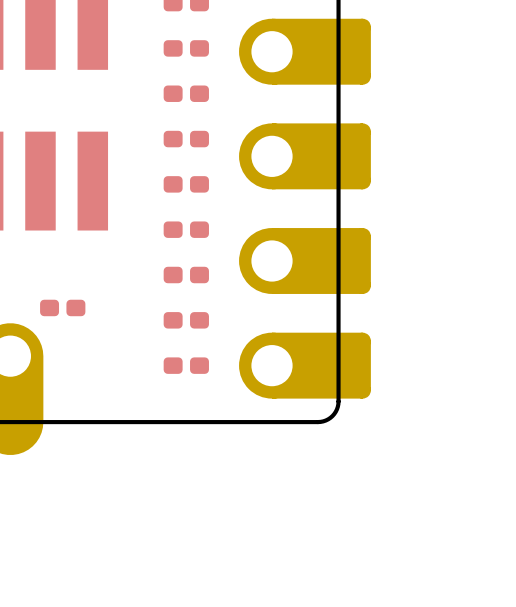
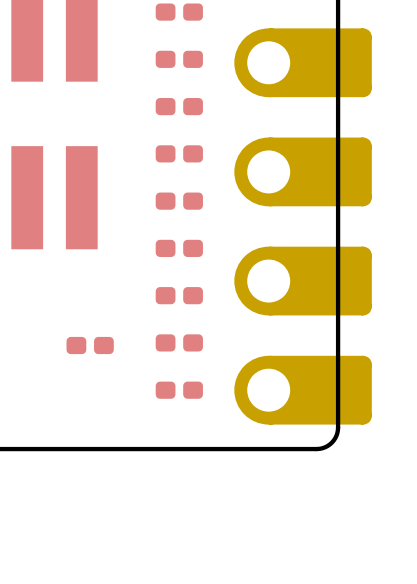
part position: (62, 307) -> (90, 345)

